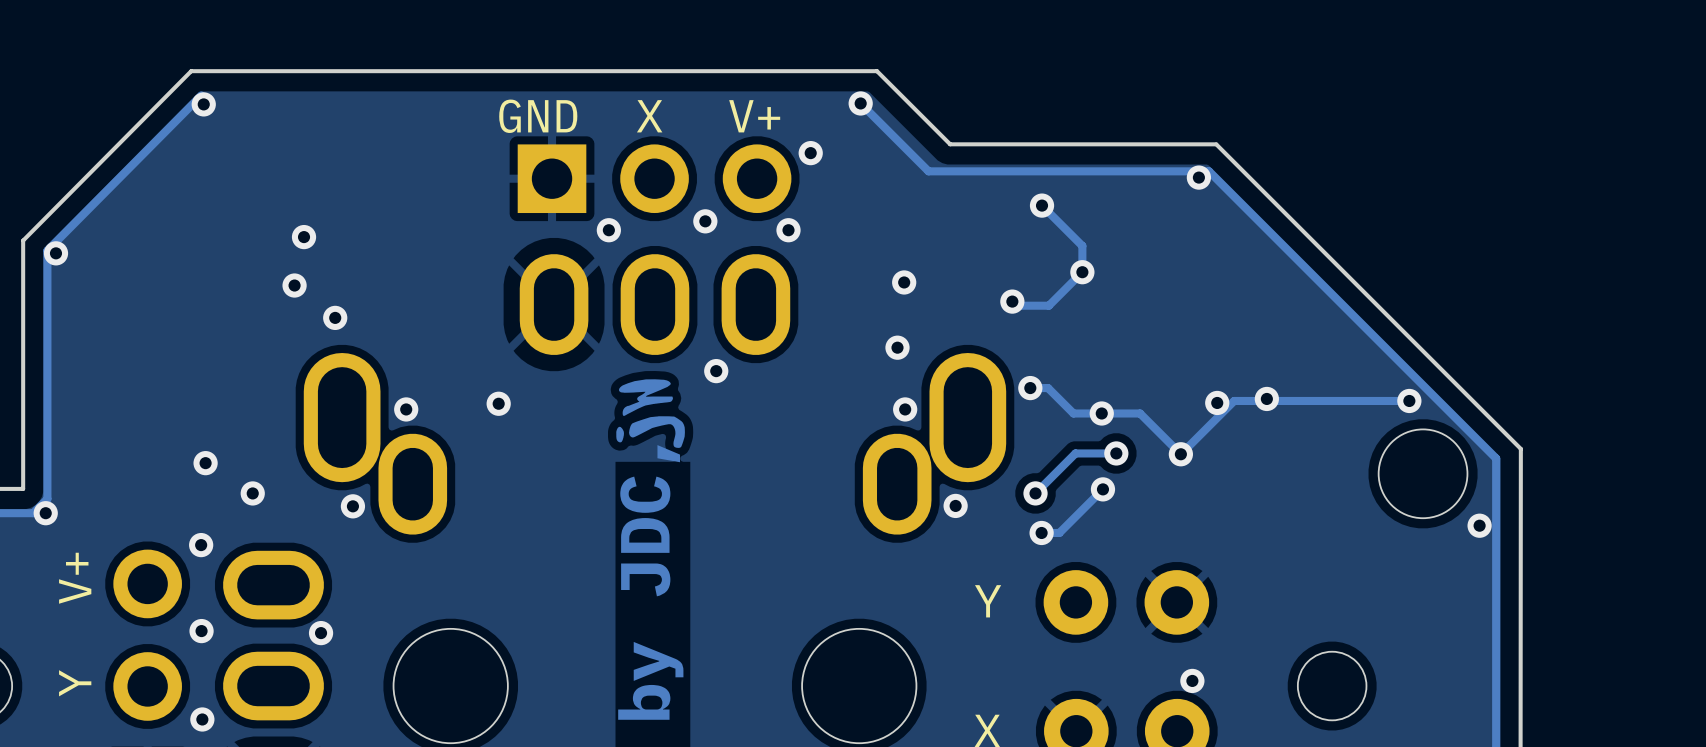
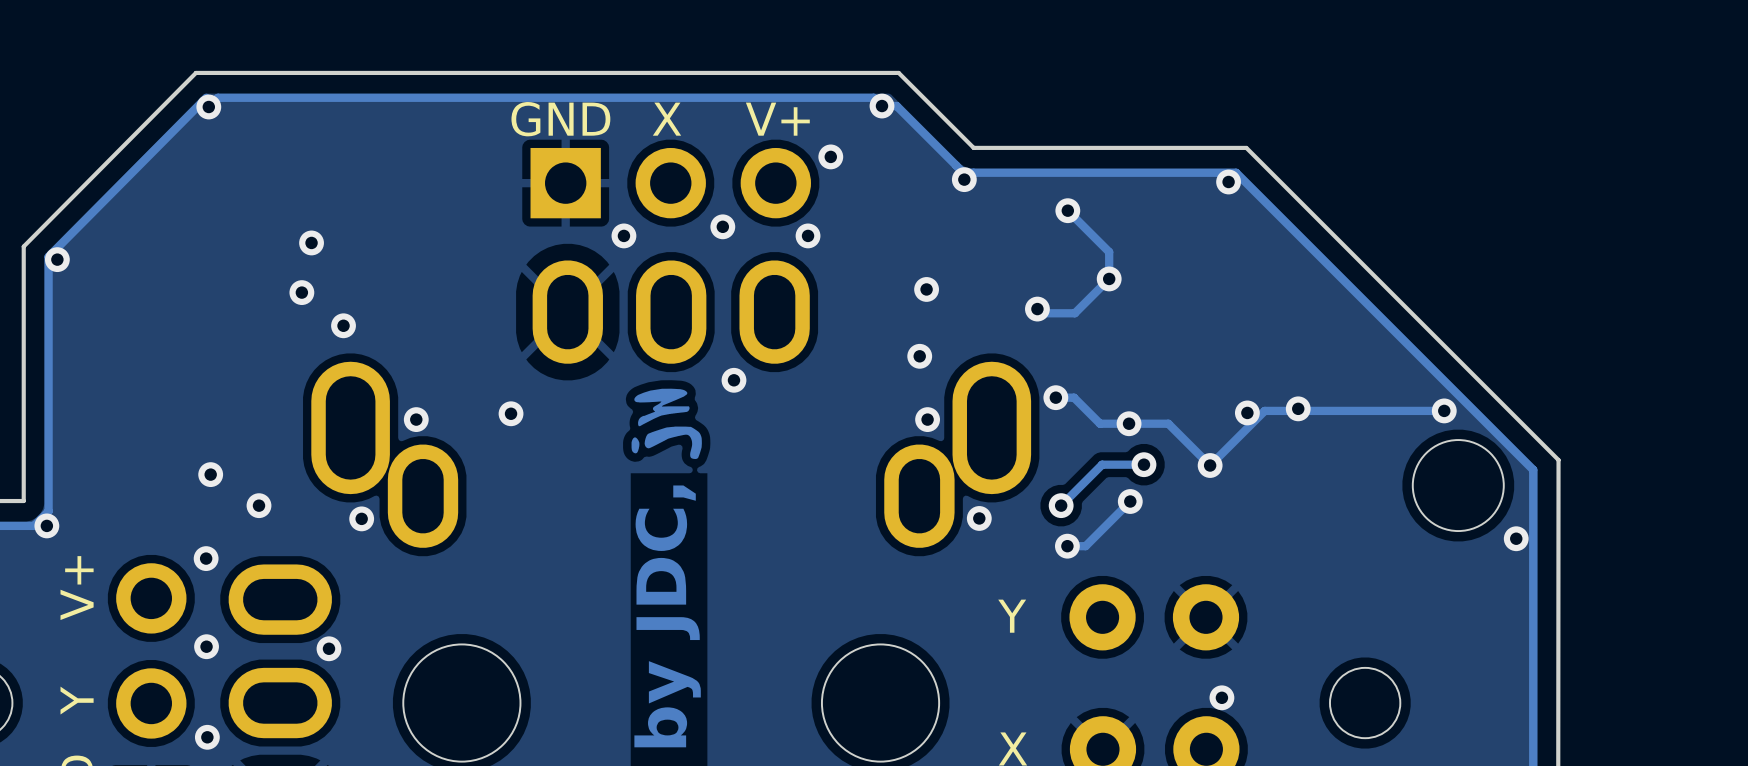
track: (860, 103) (928, 171) (1209, 171) (1496, 458) -> (208, 106) (217, 97) (873, 97) (881, 106) (896, 106) (963, 172) (1236, 172) (1533, 469)
via: none -> (964, 179)

